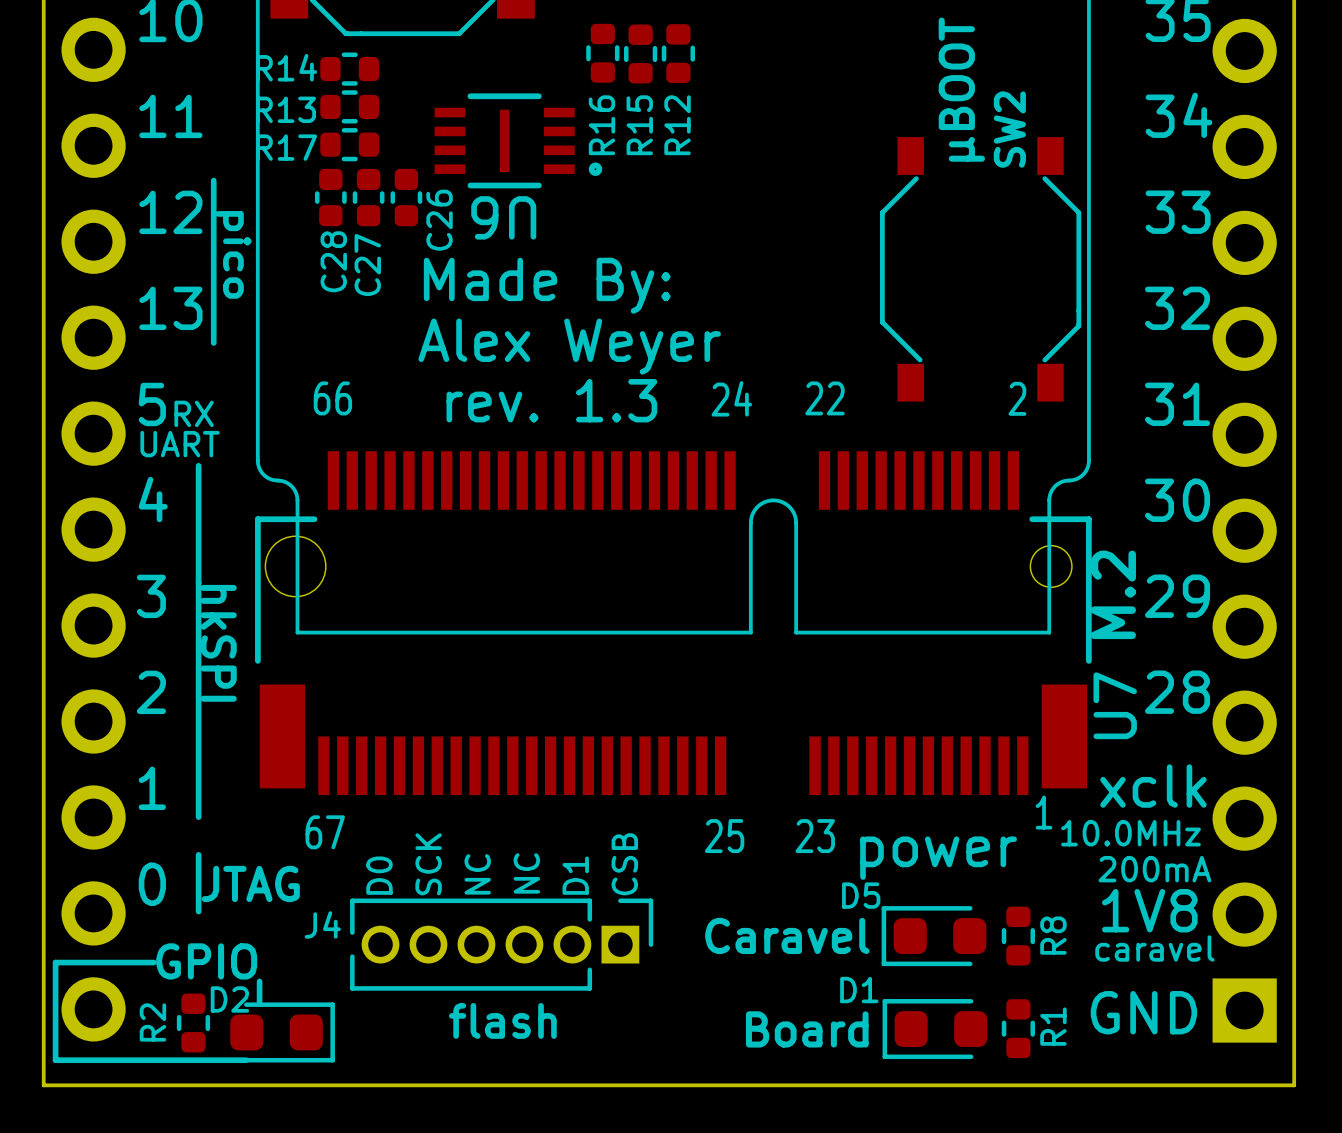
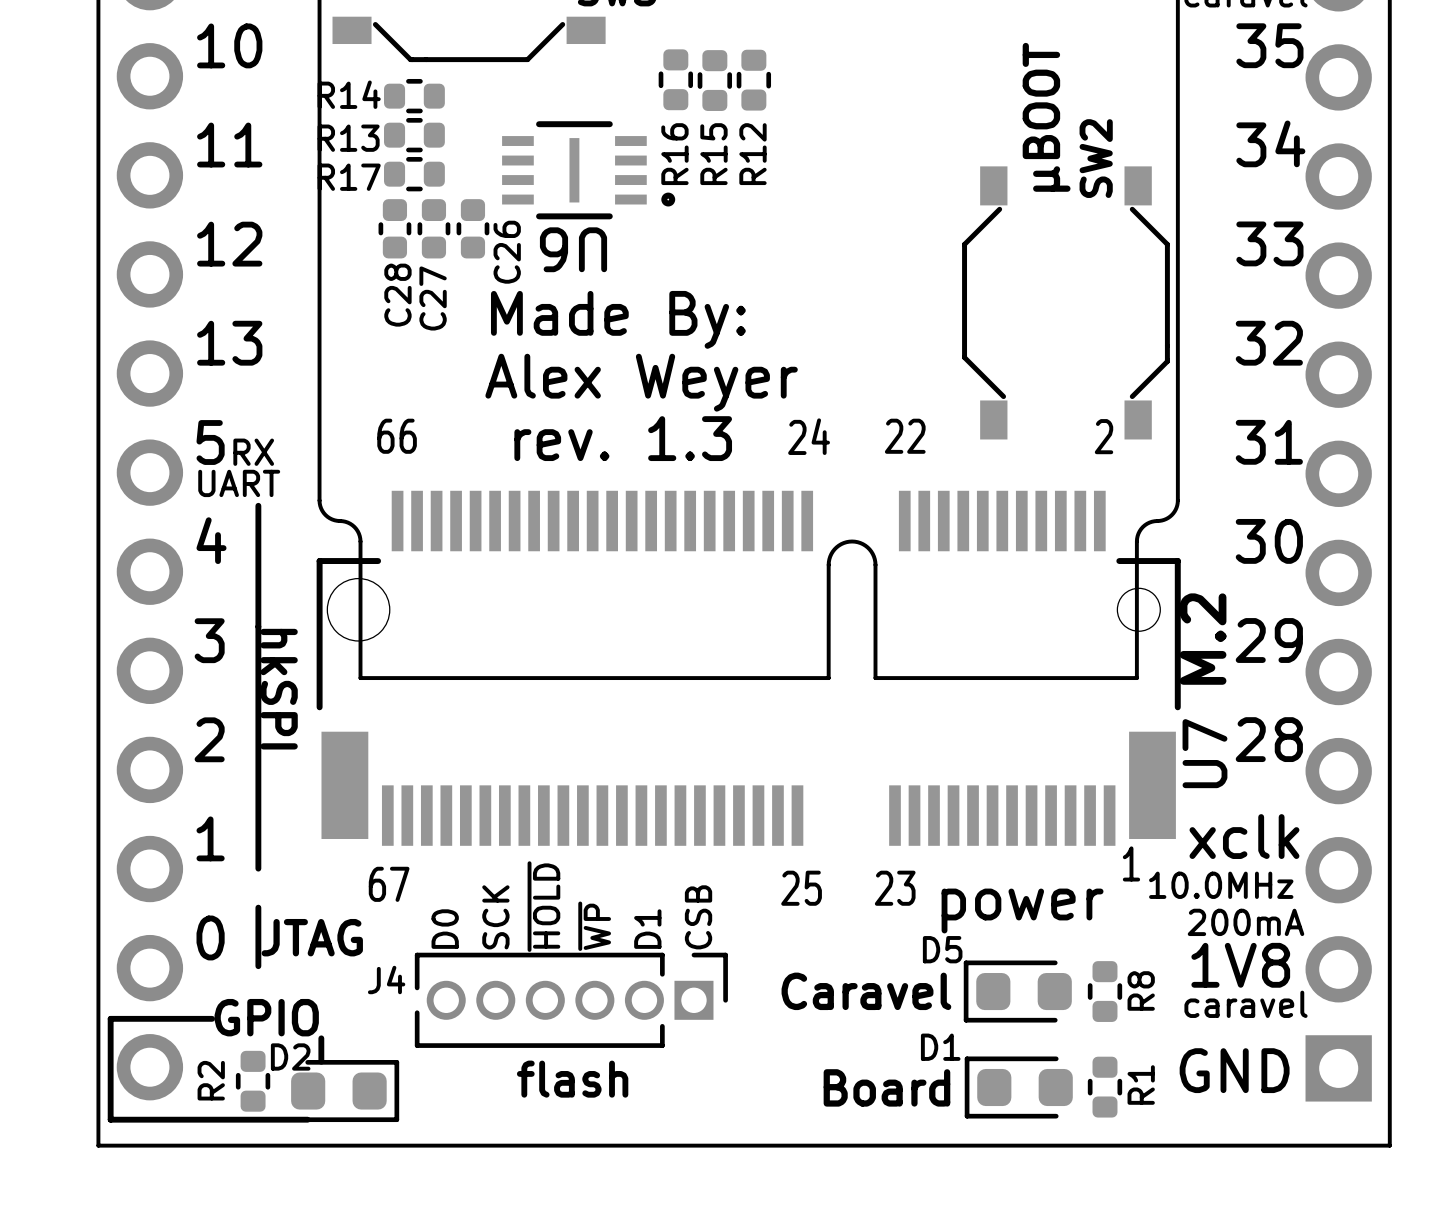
line: (213, 180) (213, 343) -> none
text: pico (233, 254) -> none
text: NC (526, 873) -> ~{WP} (594, 926)
text: NC (477, 874) -> ~{HOLD} (543, 906)

